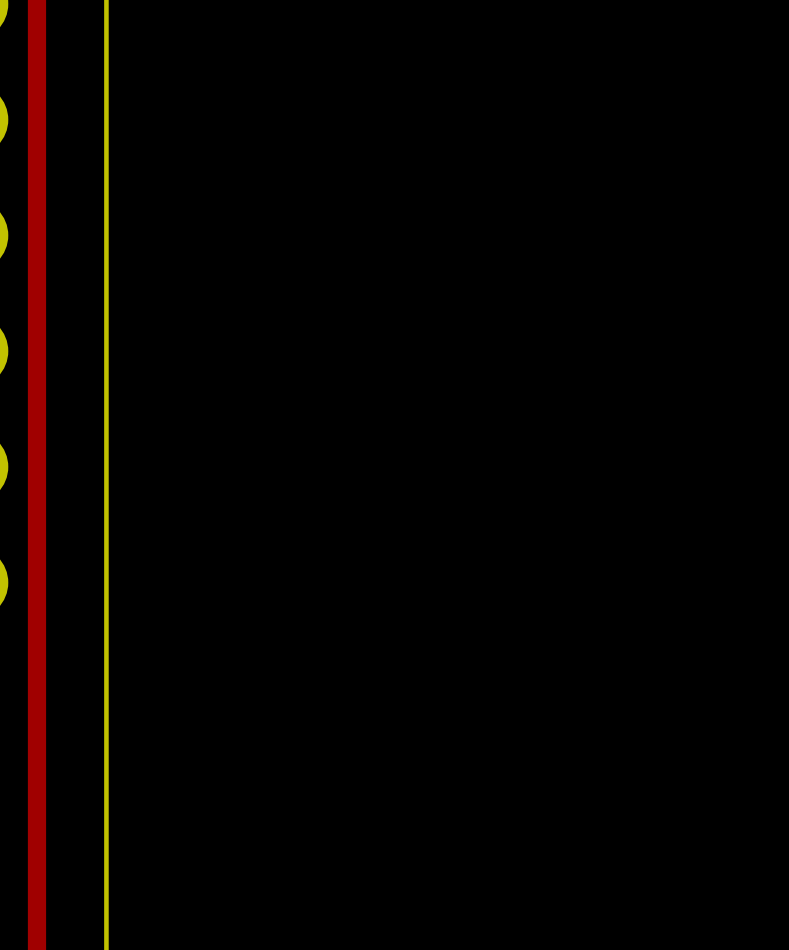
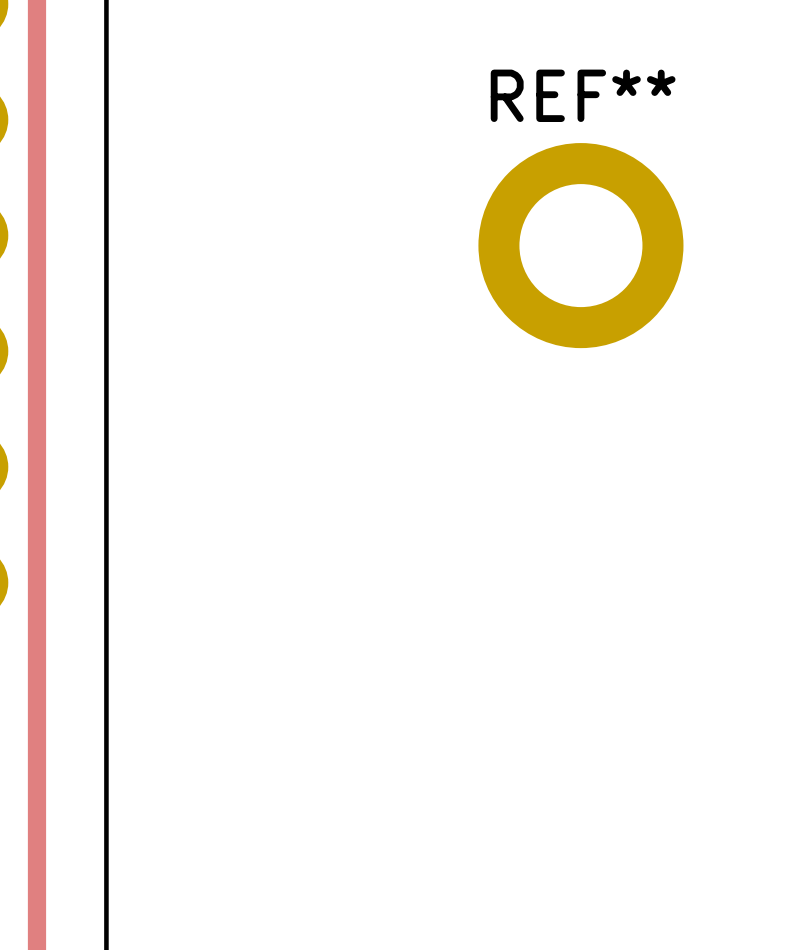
REF**: none -> (580, 245)

